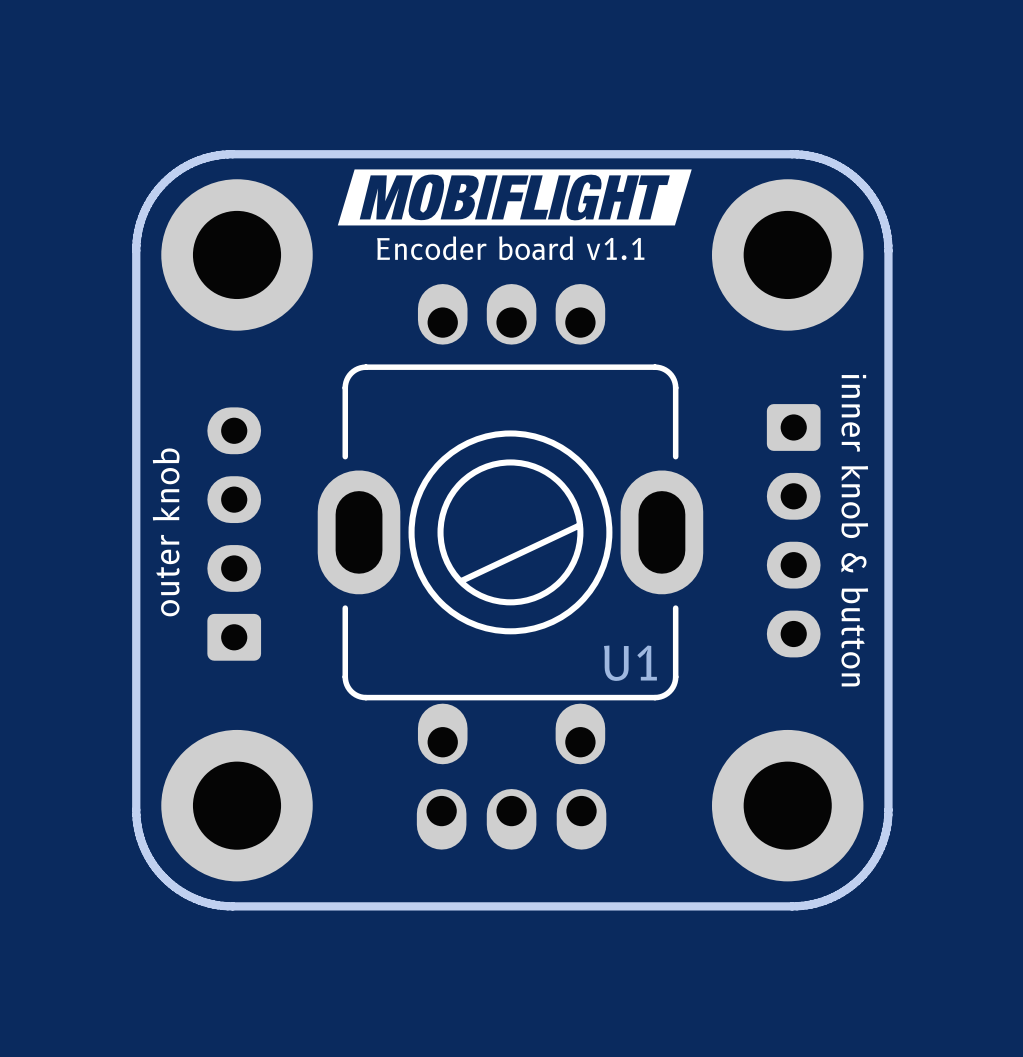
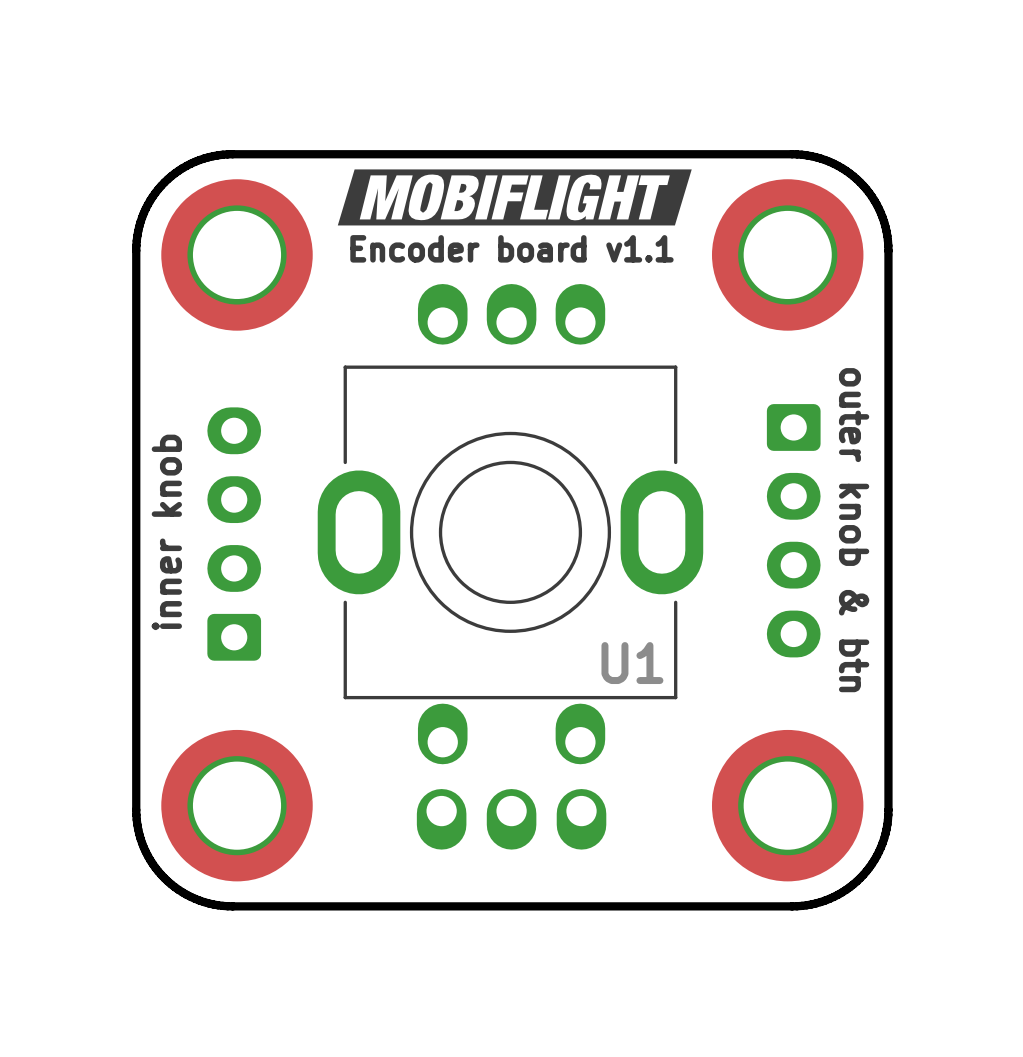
U1 footprint: [317, 284, 704, 850] -> [317, 284, 704, 850]
text: inner knob & button (854, 530) -> outer knob & btn (854, 530)
text: outer knob (166, 532) -> inner knob (166, 532)

